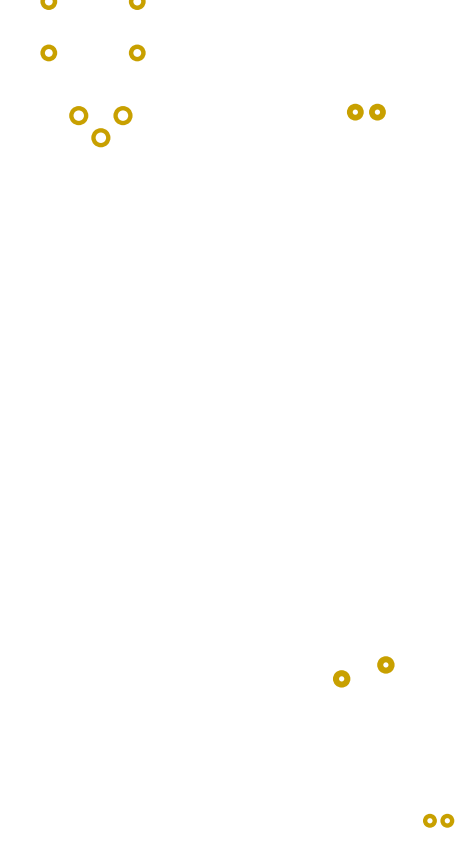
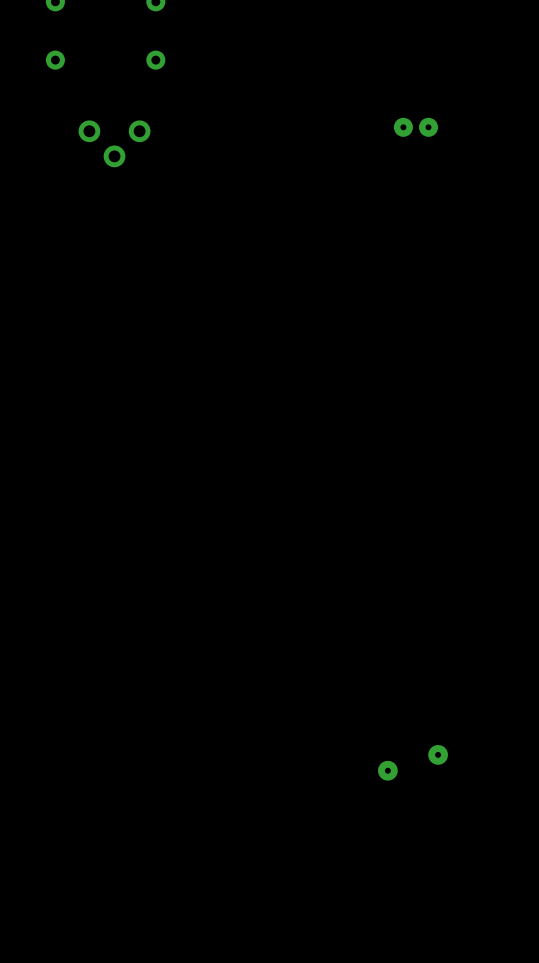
part: (438, 820) -> none

